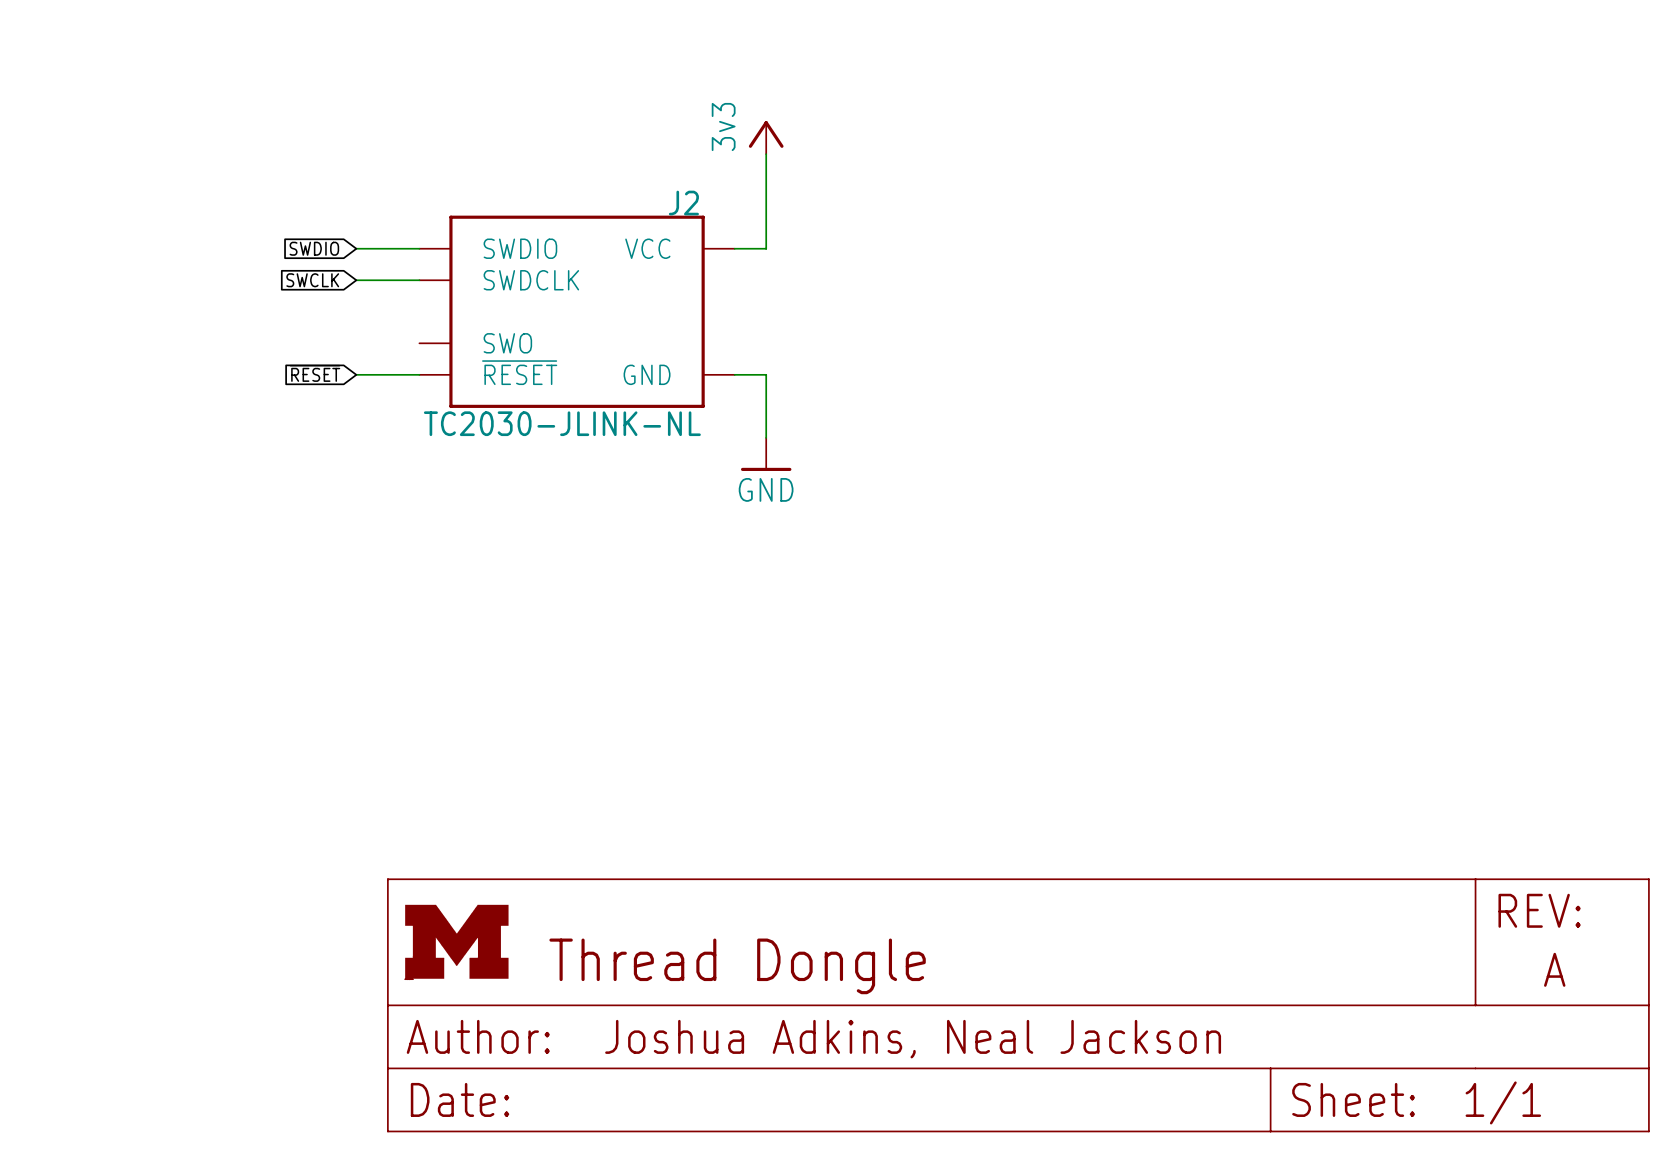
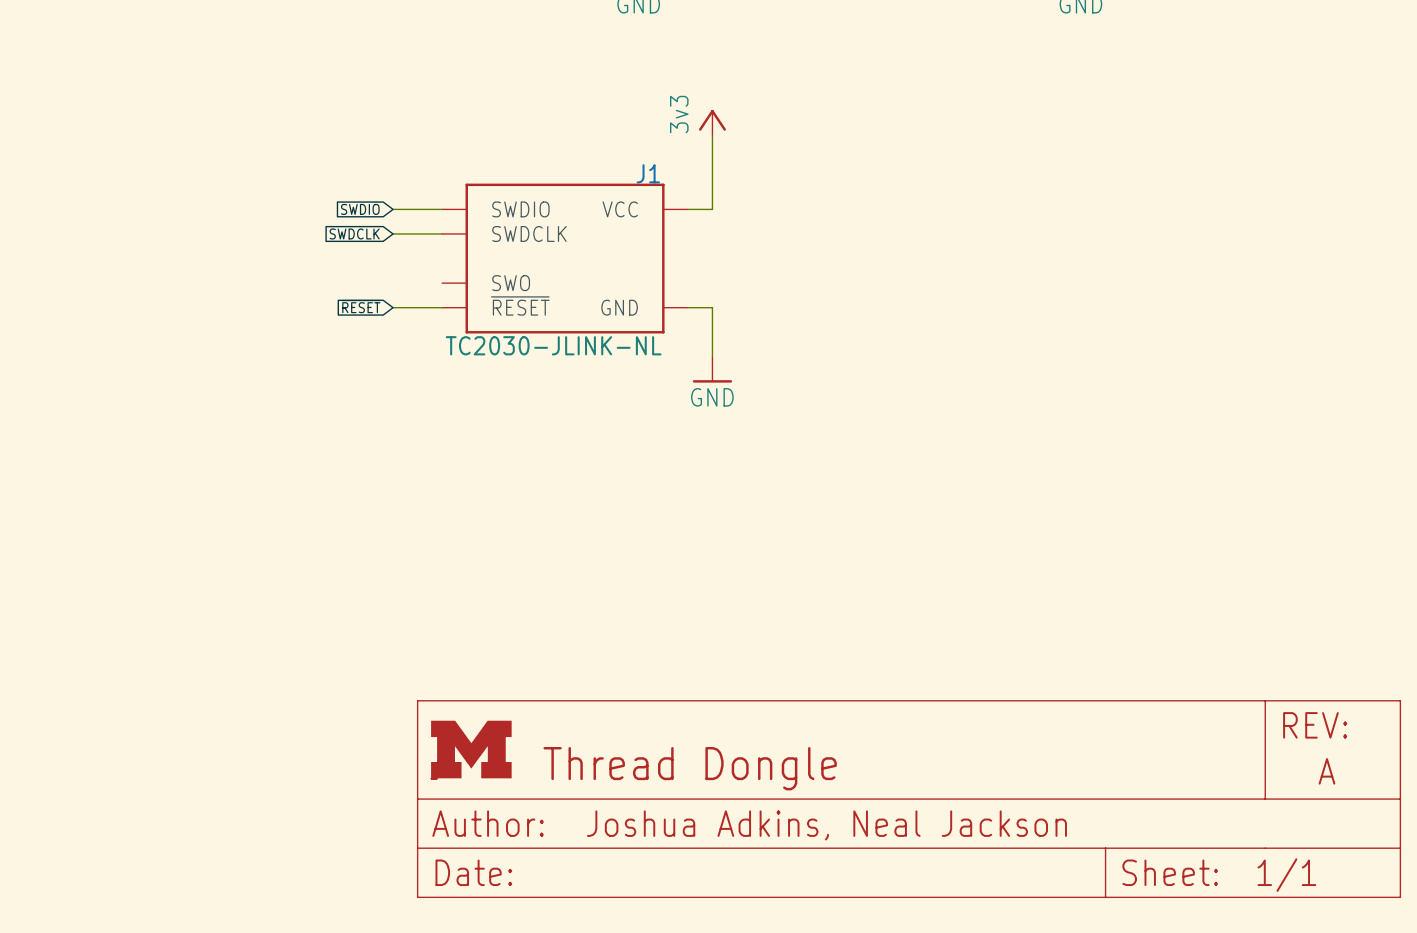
J2 name: J2 (683, 203) -> J1 (648, 173)
global label: SWCLK (312, 280) -> SWDCLK (354, 233)

